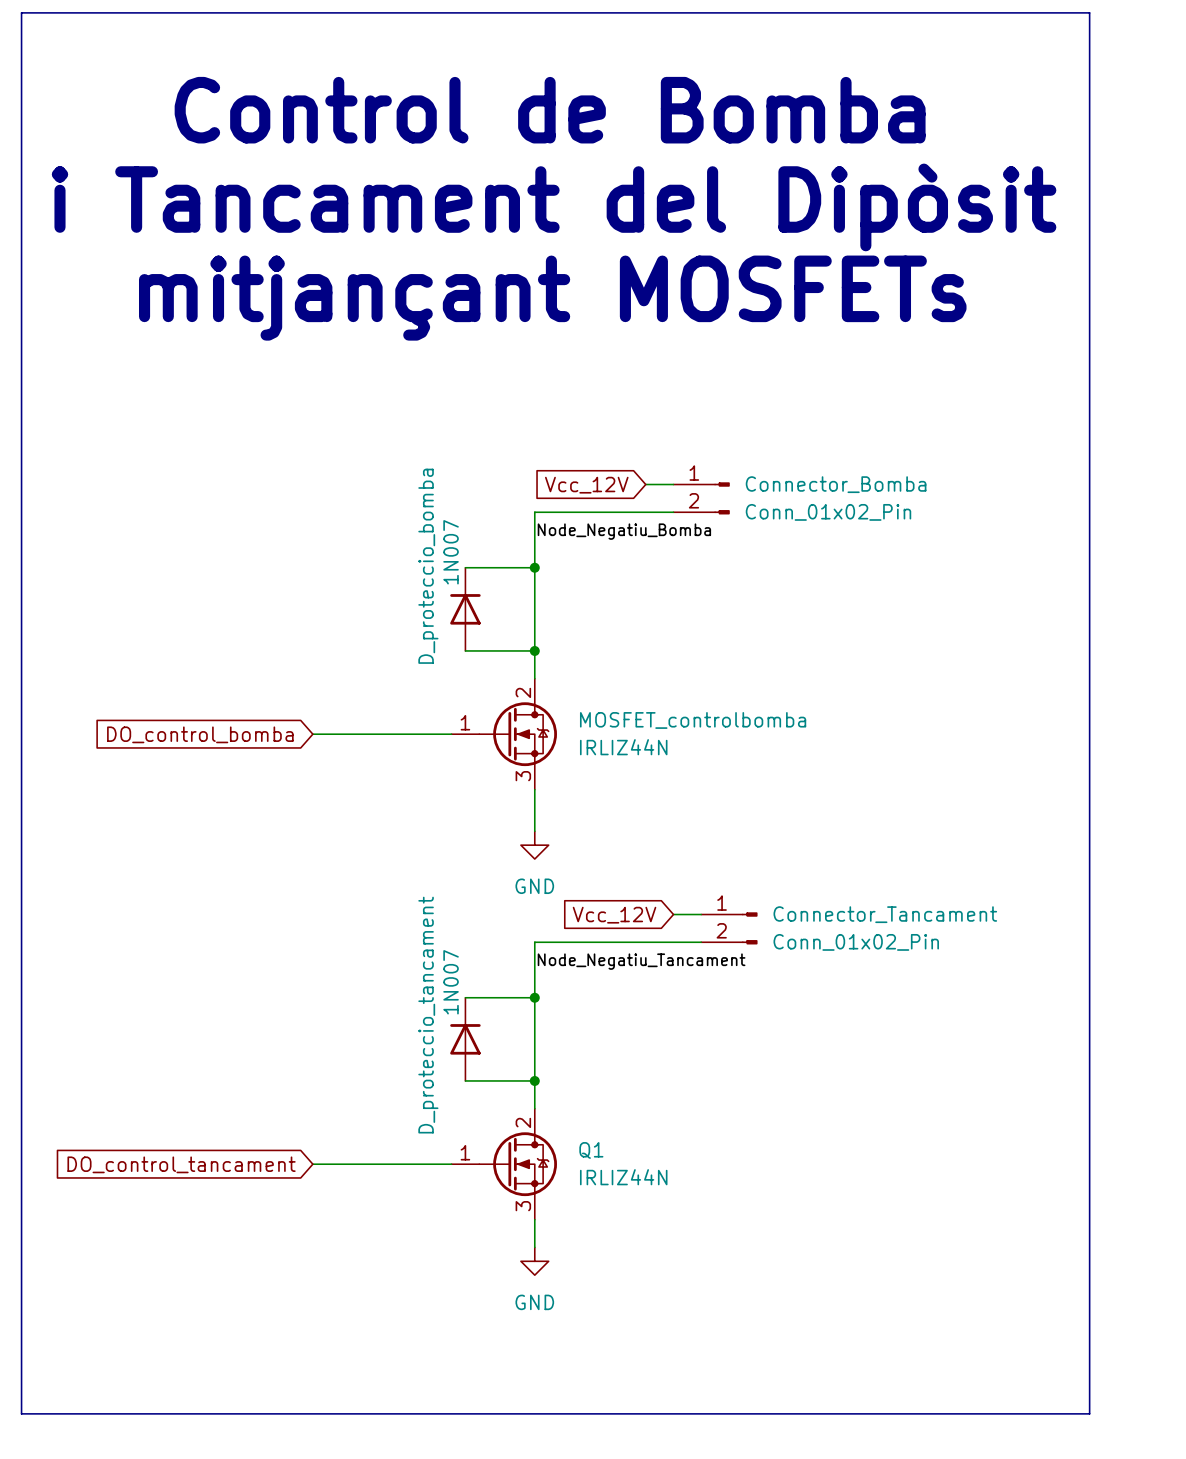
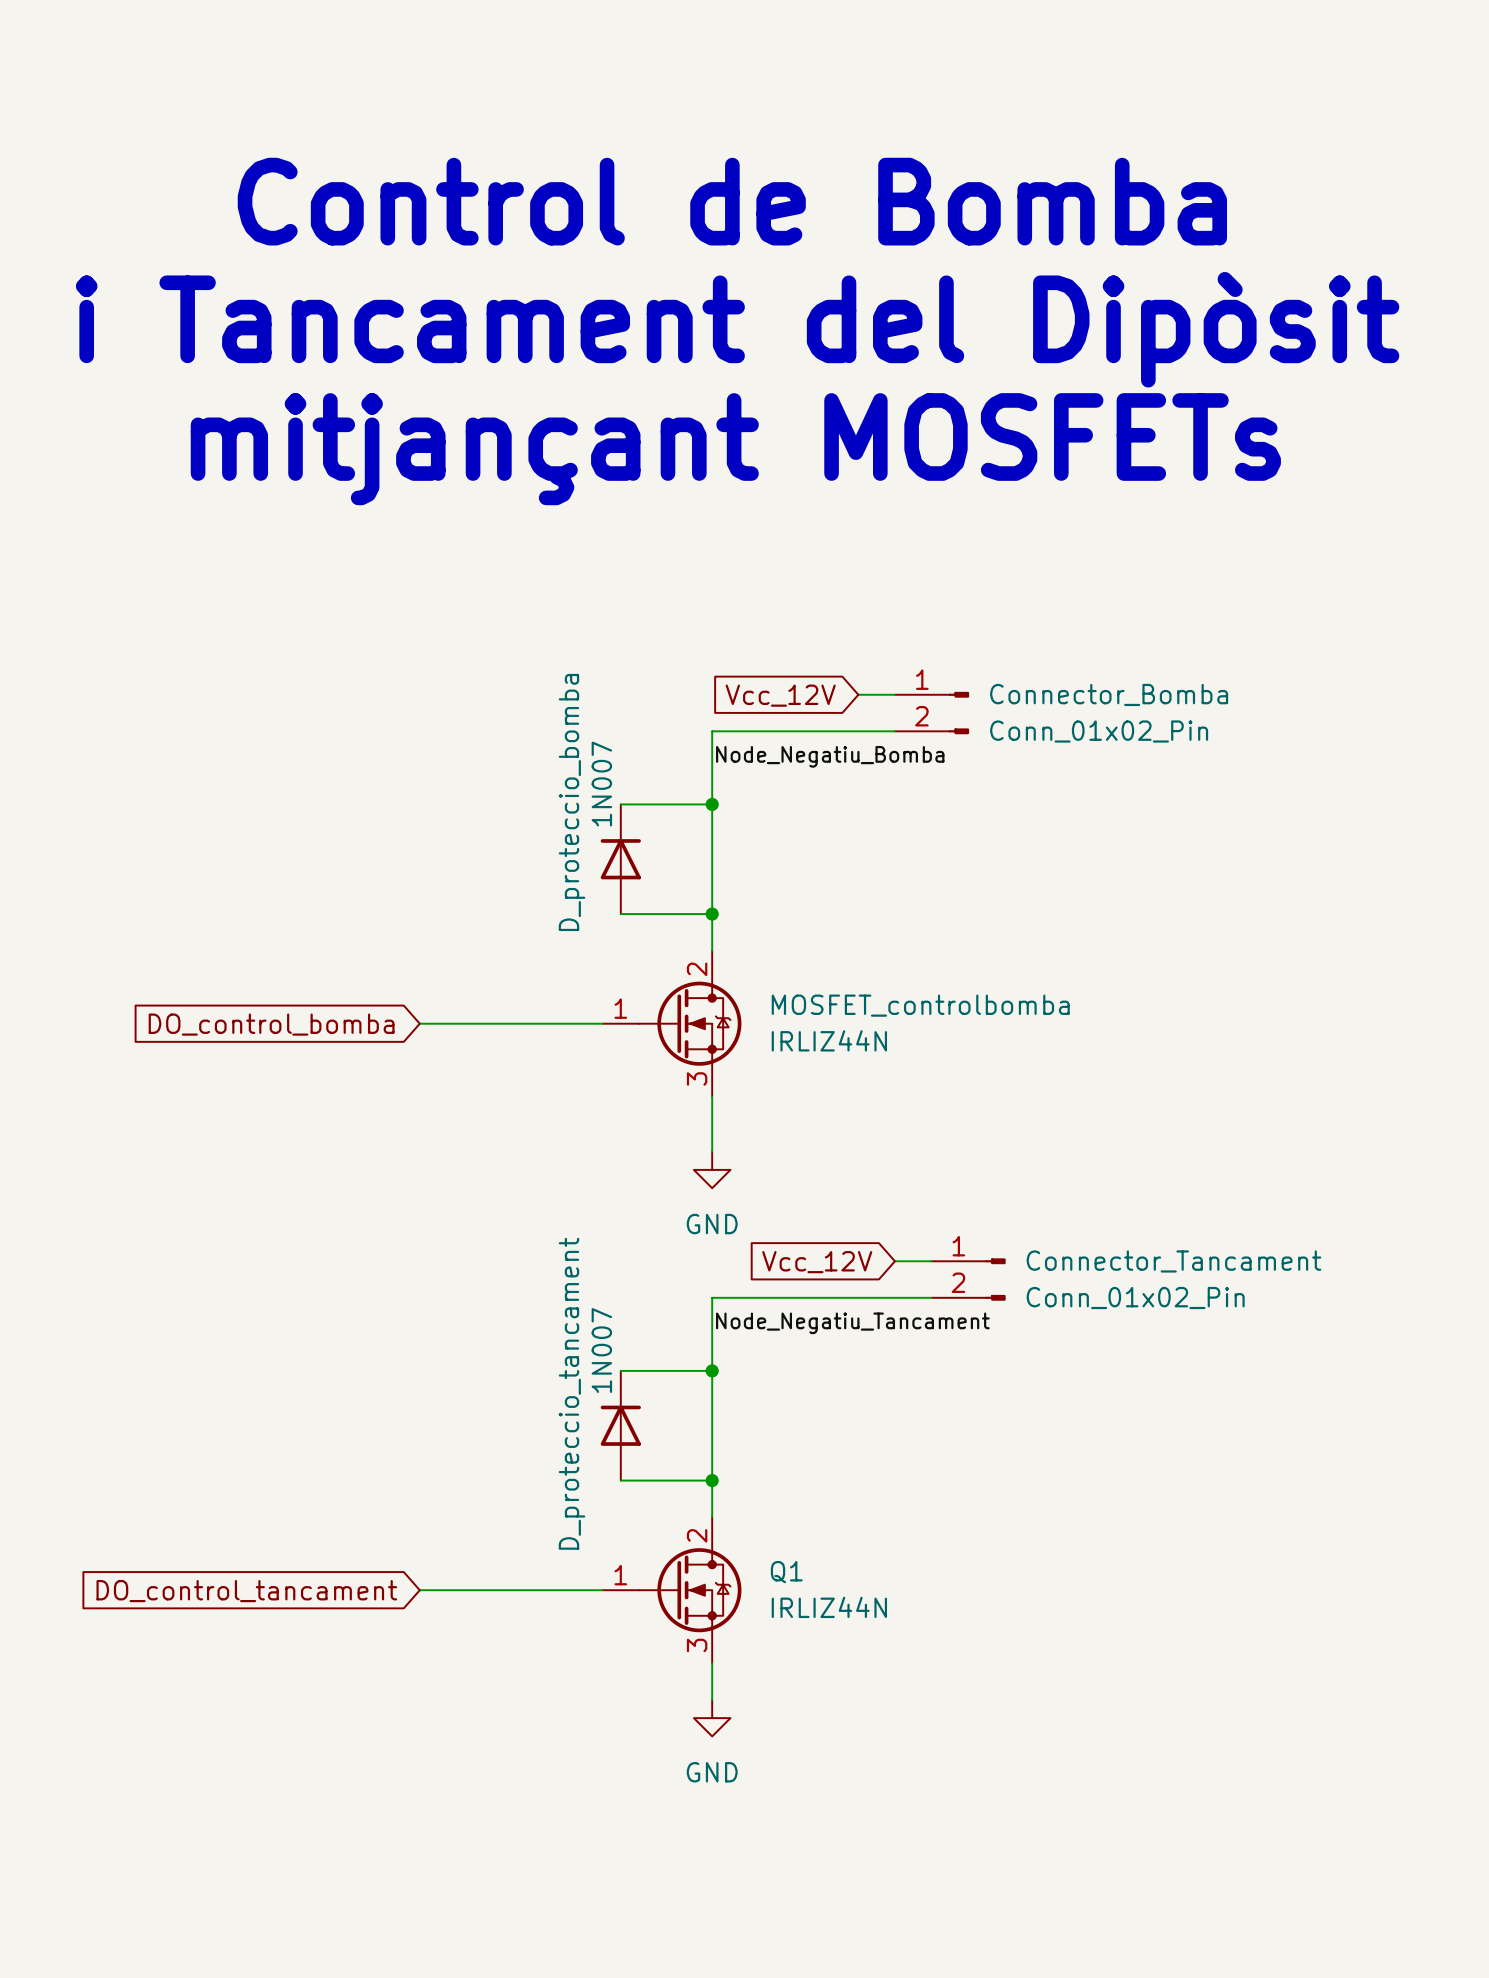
bus: (21, 12) (1089, 12) (1089, 1413) (21, 1413) (21, 12) -> none

